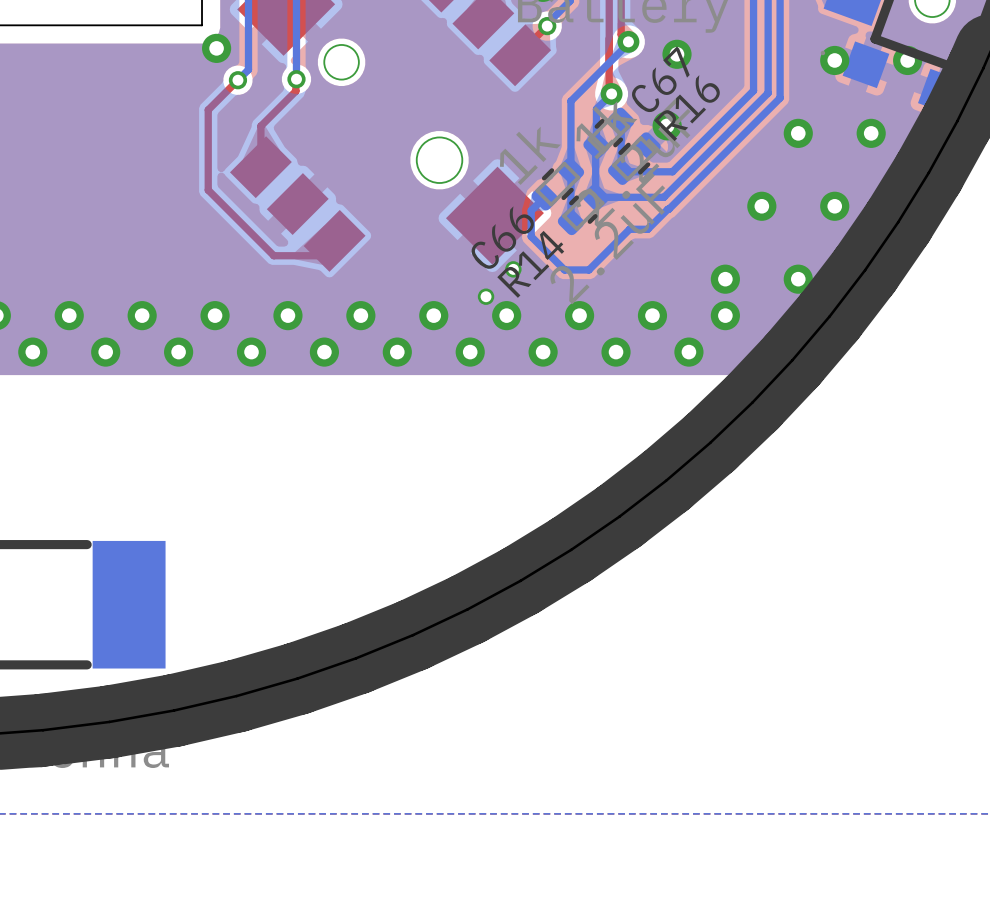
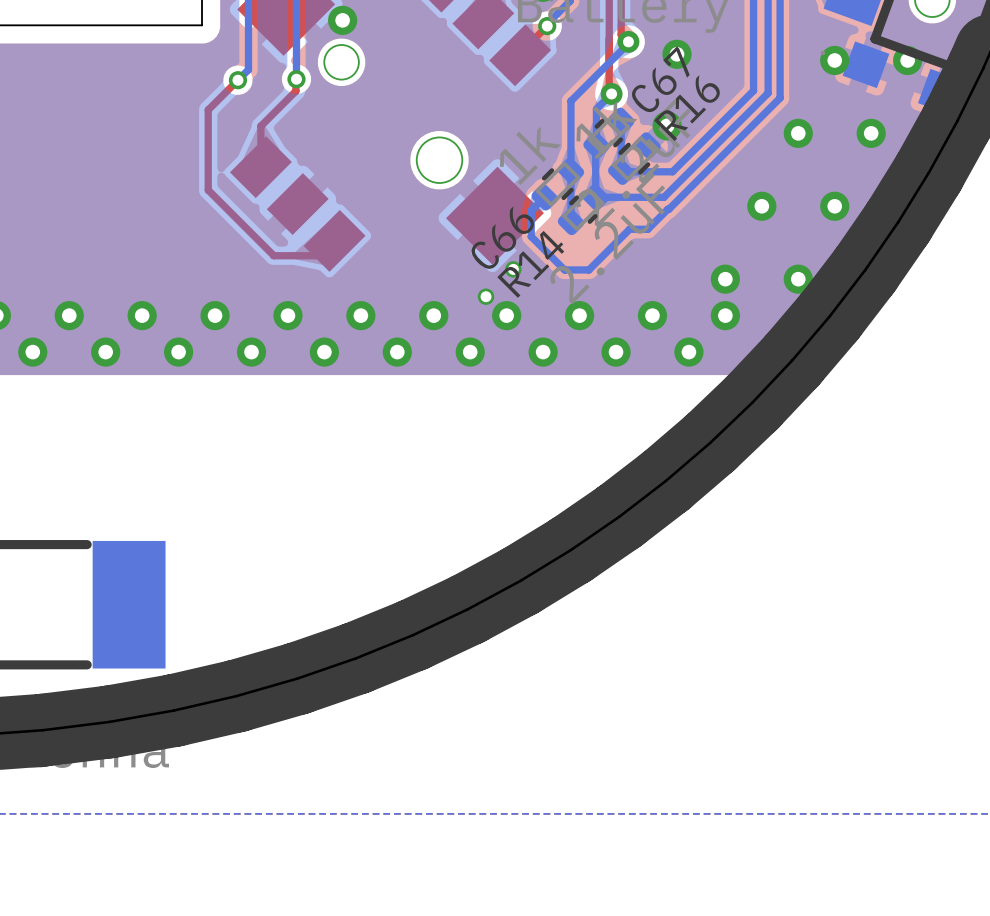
via position: (216, 48) -> (342, 20)

